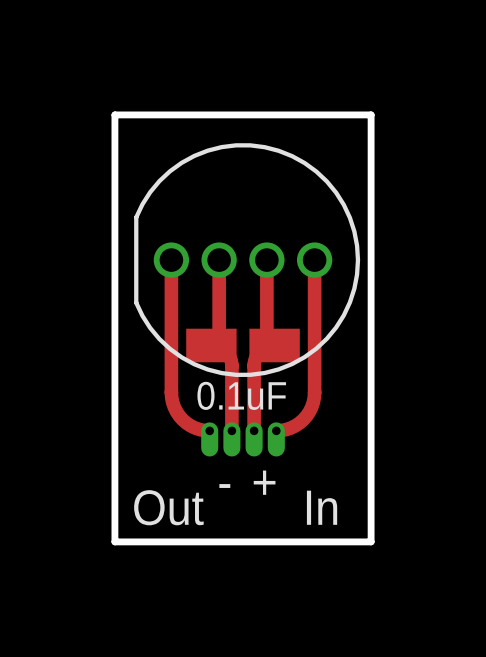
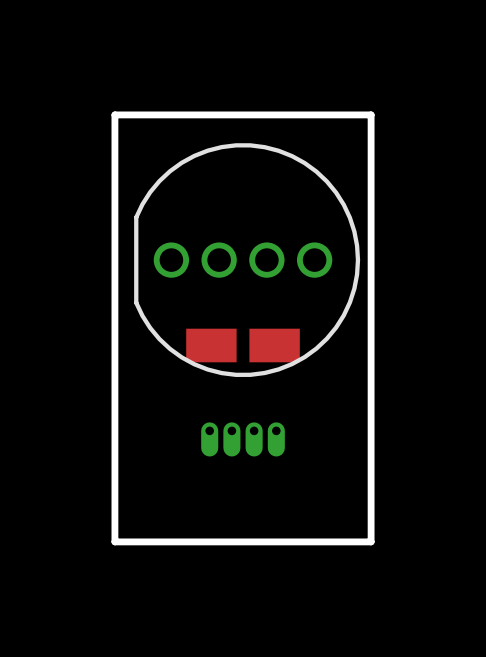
track: (171, 260) (172, 402) (176, 411) (186, 422) (199, 429) (209, 430) -> none
track: (219, 260) (219, 338) (216, 343) (211, 345) (223, 349) (231, 360) (231, 430) -> none
track: (266, 260) (266, 338) (269, 343) (274, 345) (262, 349) (254, 360) (254, 430) -> none
track: (314, 260) (313, 402) (306, 415) (299, 422) (286, 429) (276, 430) -> none
part value: 0.1uF (241, 395) -> none
text: + (264, 482) -> none
text: - (224, 486) -> none
text: Out (168, 507) -> none
text: In (322, 507) -> none

